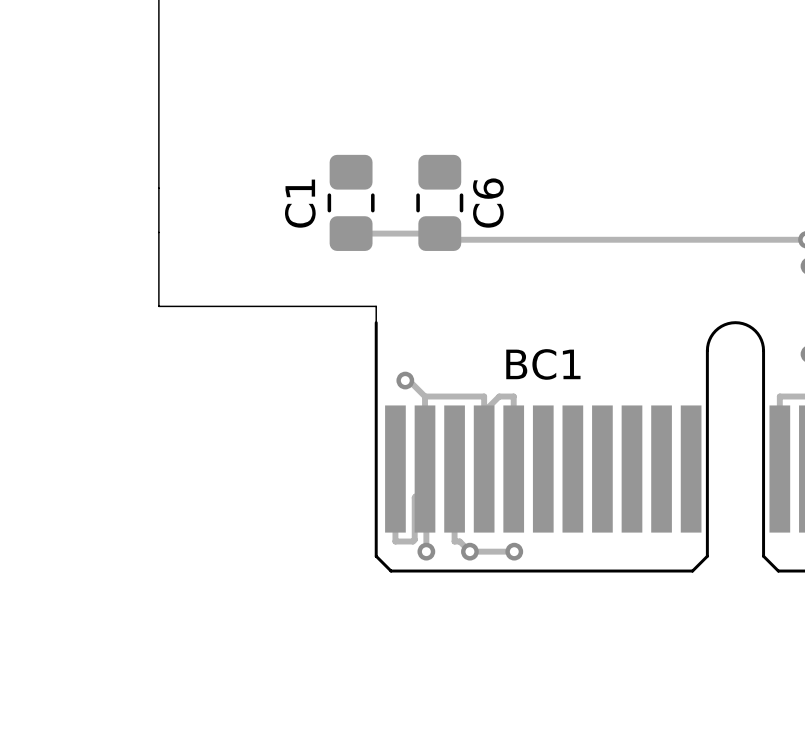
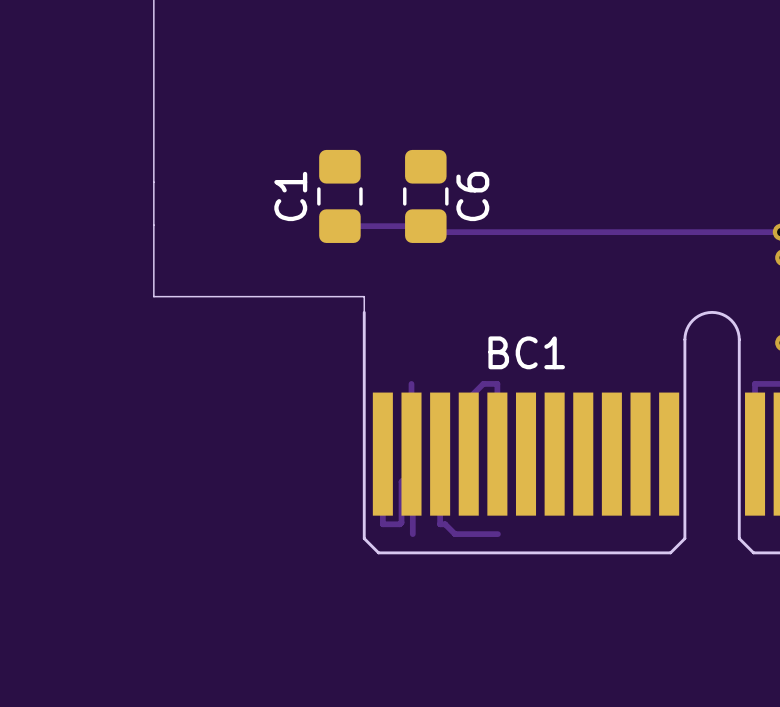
track: (405, 380) (409, 380) (425, 396) (484, 396) (484, 469) -> none
via: (405, 380) -> none
via: (426, 551) -> none
via: (469, 551) -> none
via: (514, 551) -> none

